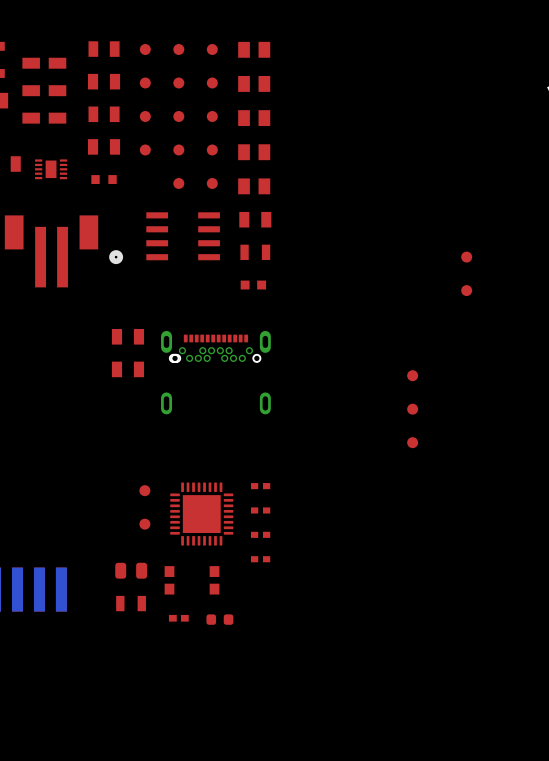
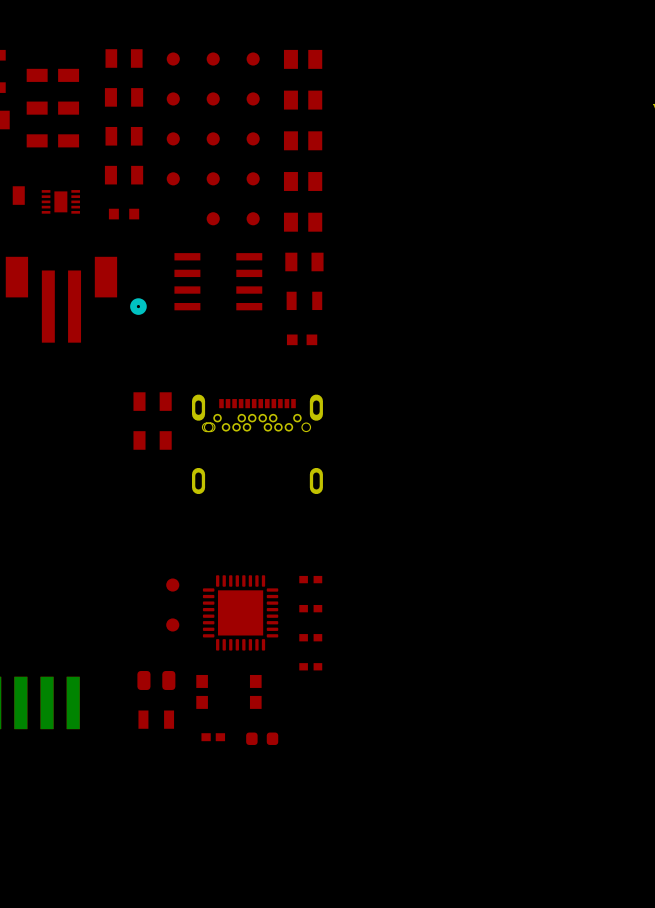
part: (466, 257) -> none
part: (466, 290) -> none
part: (412, 375) -> none
part: (412, 409) -> none
part: (412, 442) -> none

